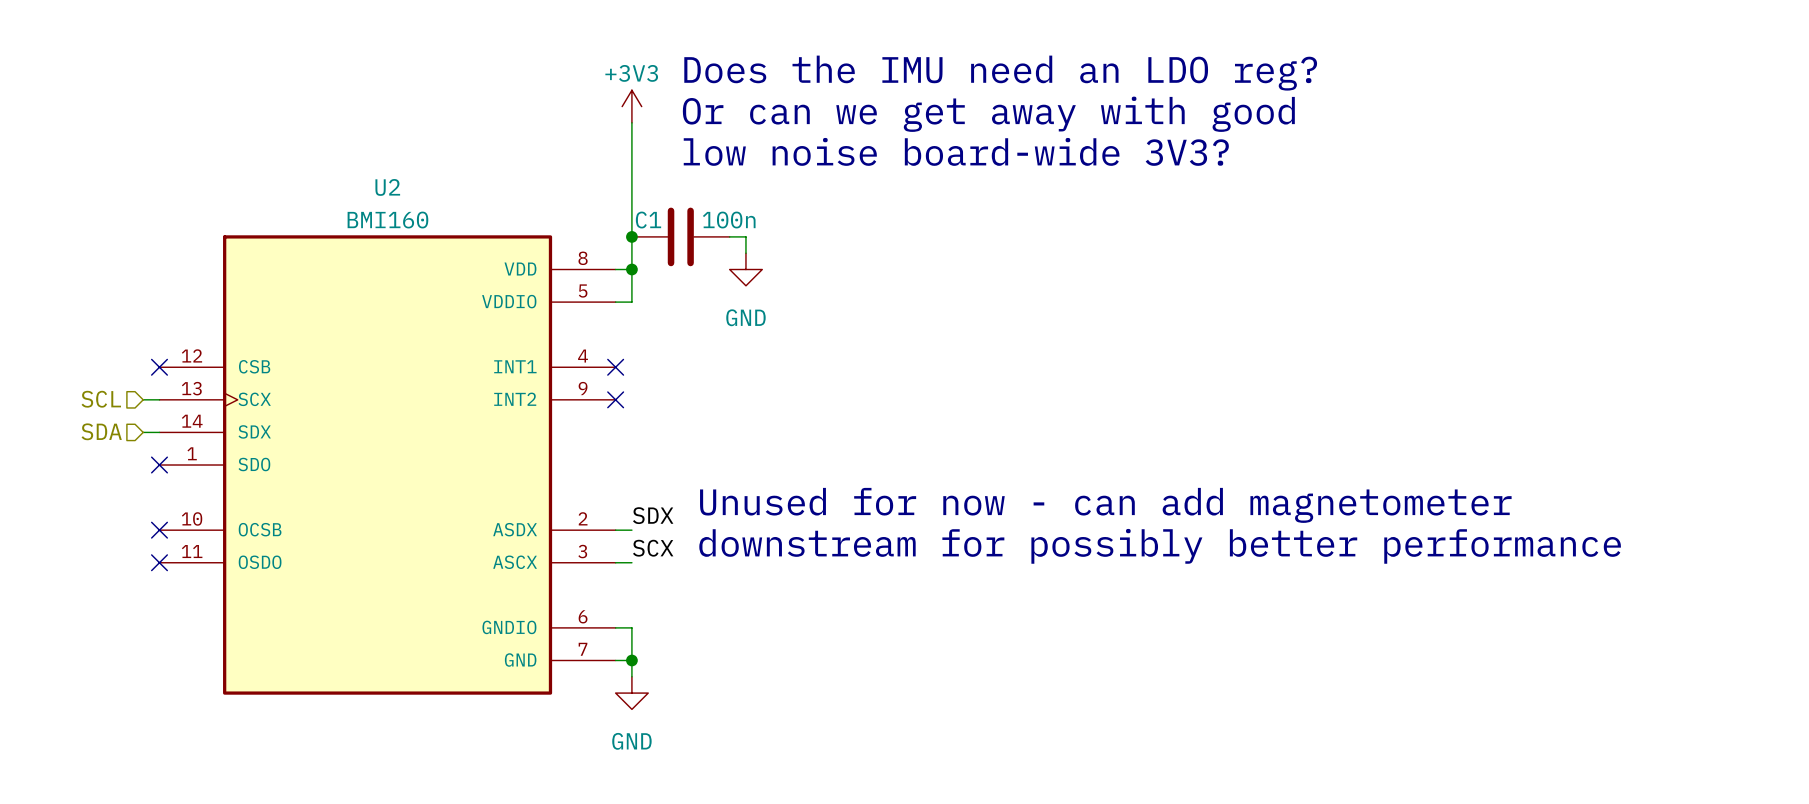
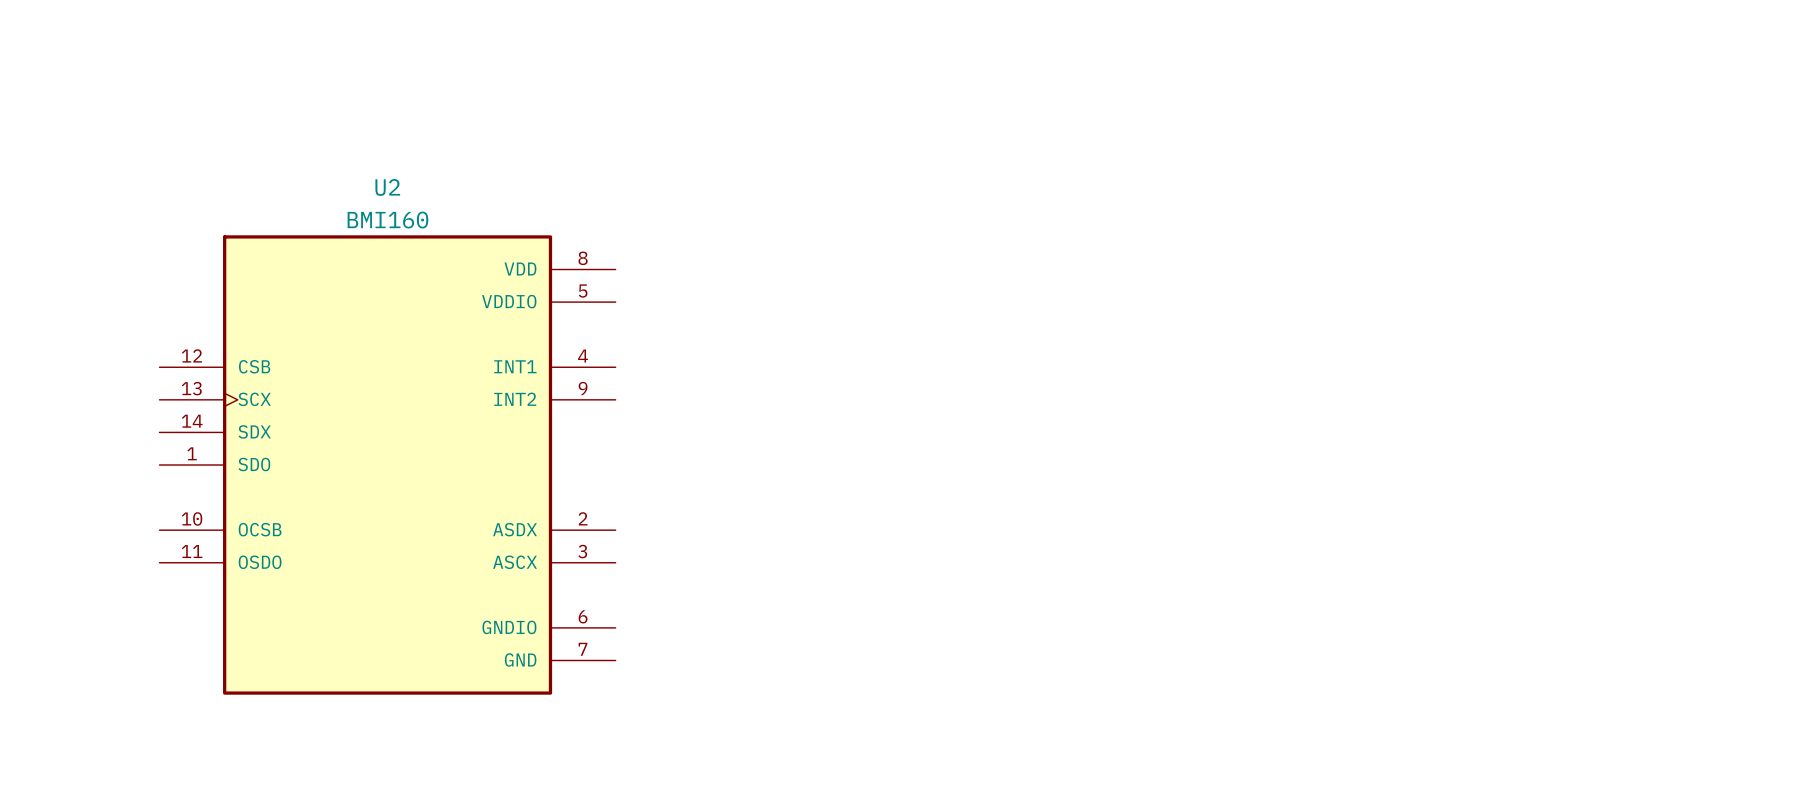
text: Does the IMU need an LDO reg? (1000, 73) -> none
power symbol: +3V3 (631, 106) -> none
text: Or can we get away with good (988, 114) -> none
wire: (631, 122) (631, 302) (615, 302) -> none
text: low noise board-wide 3V3? (956, 151) -> none
junction: (631, 236) -> none
C1: 100n (680, 236) -> none
wire: (729, 236) (745, 236) (745, 253) -> none
wire: (615, 269) (631, 269) -> none
junction: (631, 269) -> none
power symbol: GND (745, 269) -> none
no-connect mark: (159, 367) -> none
no-connect mark: (615, 367) -> none
hierarchical label: SCL (101, 399) -> none
wire: (143, 399) (159, 399) -> none
no-connect mark: (615, 399) -> none
hierarchical label: SDA (101, 431) -> none
wire: (143, 432) (159, 432) -> none
no-connect mark: (159, 465) -> none
text: Unused for now - can add magnetometer (1105, 505) -> none
label: SDX (653, 515) -> none
no-connect mark: (159, 530) -> none
wire: (615, 530) (631, 530) -> none
text: downstream for possibly better performance (1160, 546) -> none
label: SCX (653, 548) -> none
no-connect mark: (159, 562) -> none
wire: (615, 562) (631, 562) -> none
wire: (615, 627) (631, 627) (631, 676) -> none
wire: (615, 660) (631, 660) -> none
junction: (631, 660) -> none
power symbol: GND (631, 693) -> none

